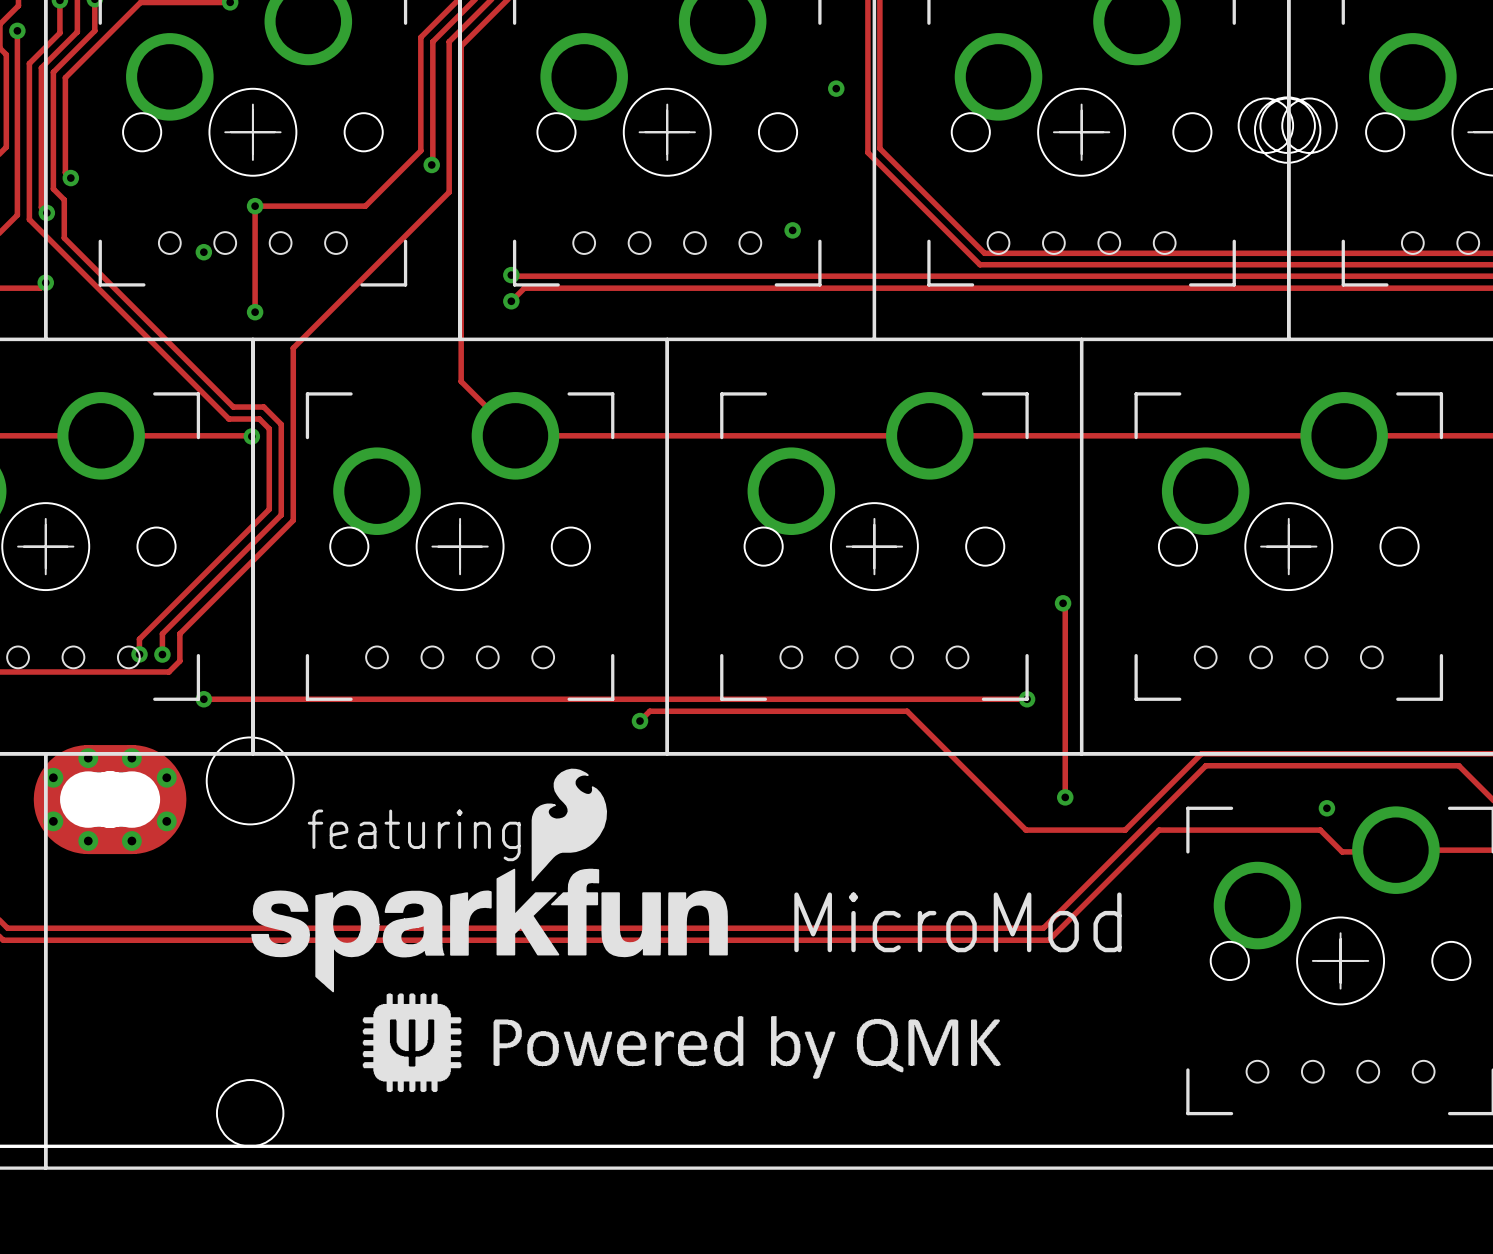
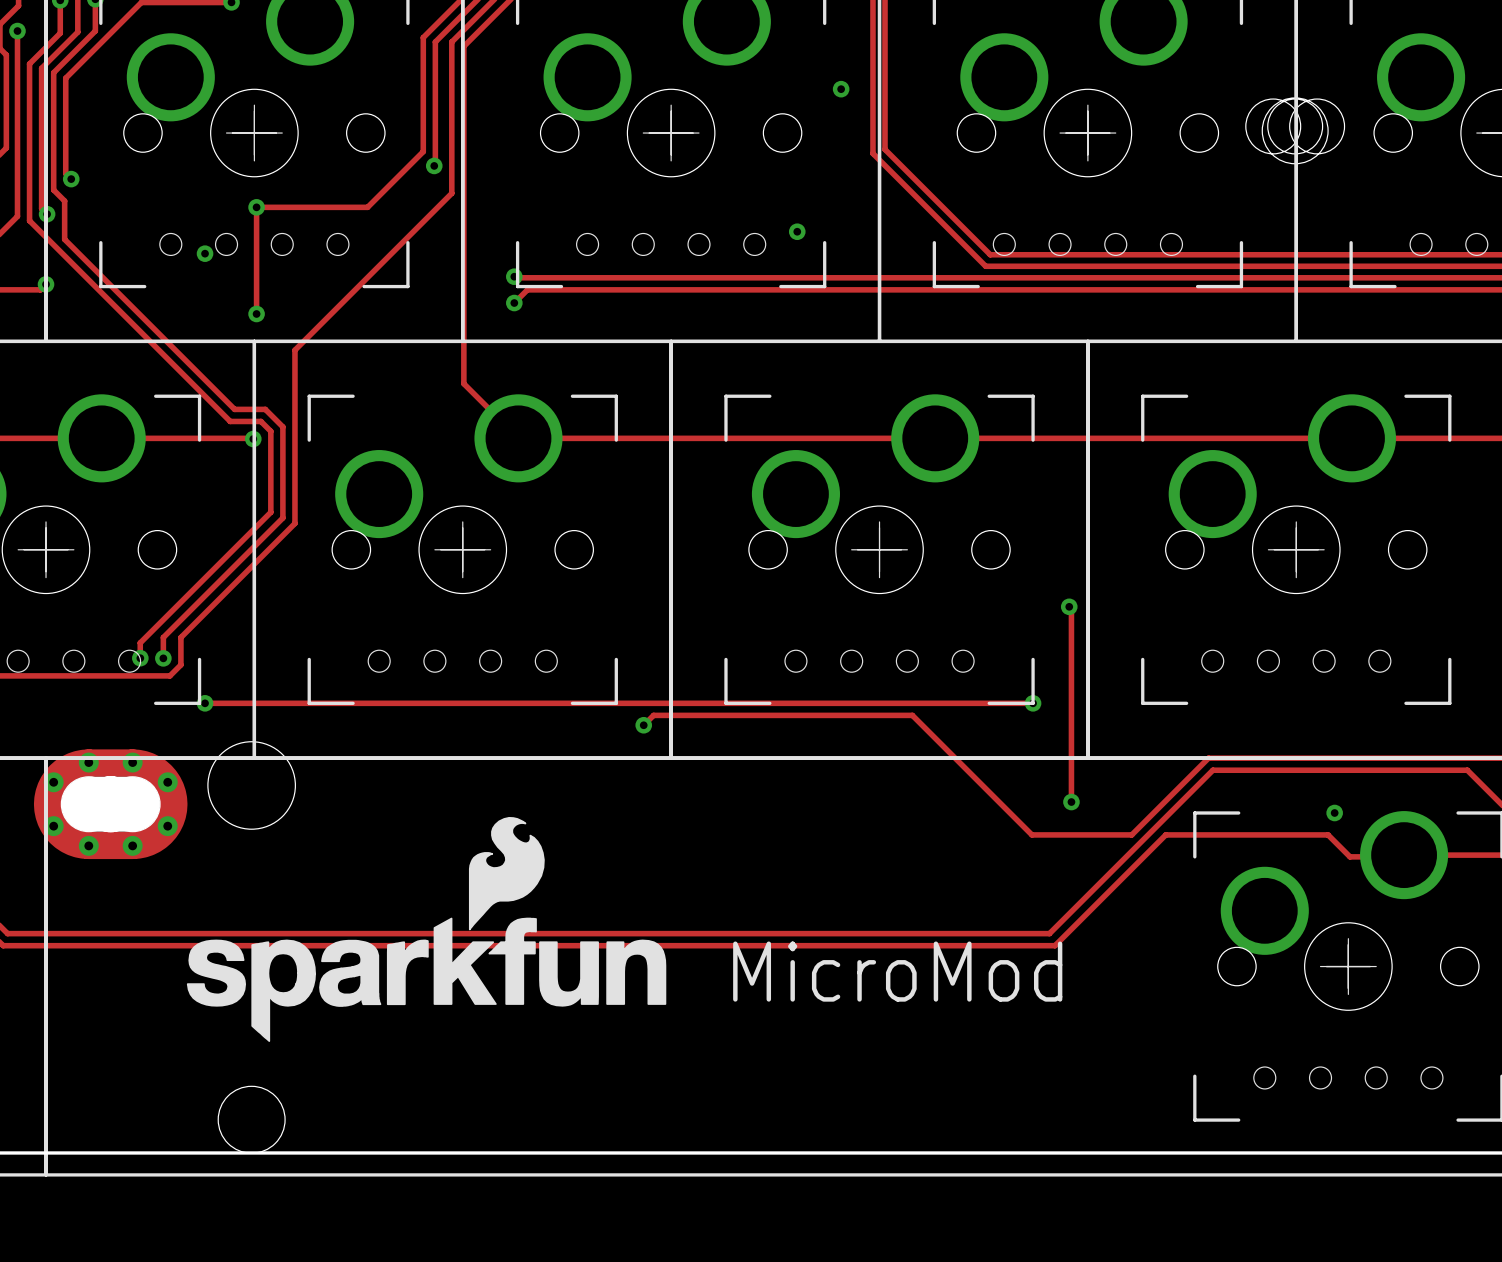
text: featuring (414, 835) -> none
drawing position: (489, 880) -> (426, 929)
text position: MicroMod (957, 922) -> MicroMod (897, 971)
drawing: [362, 993, 1001, 1093] -> none

